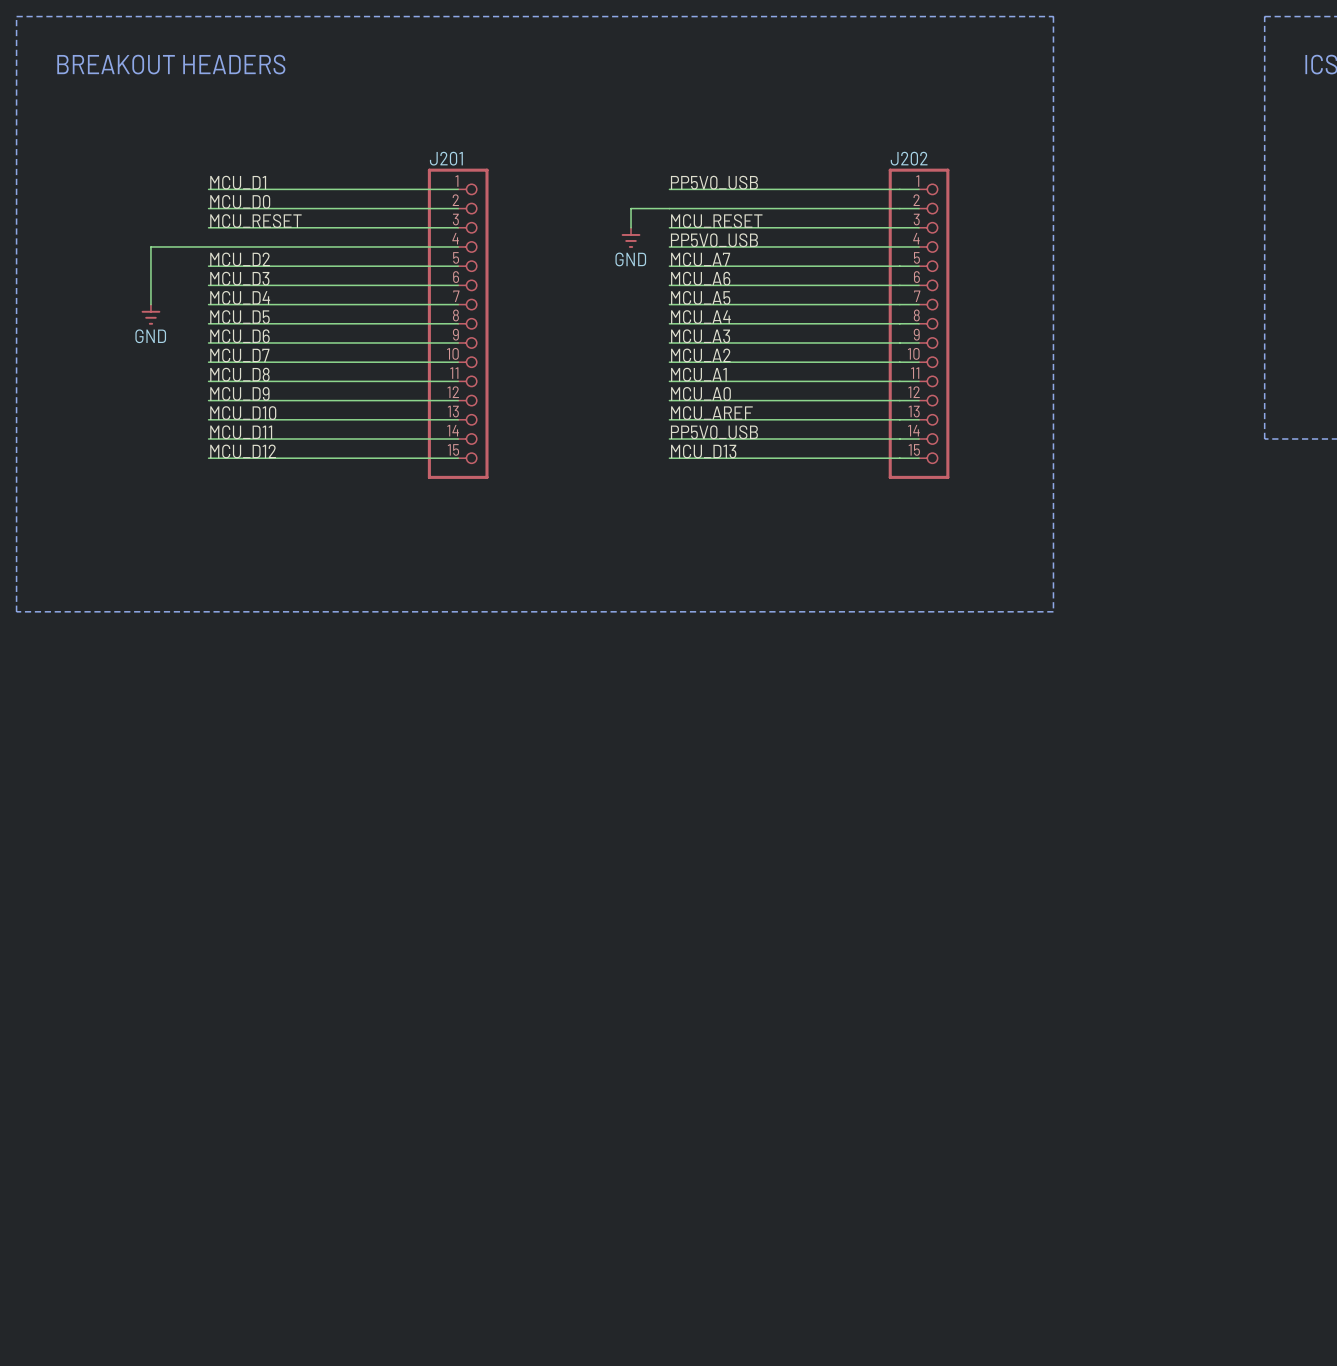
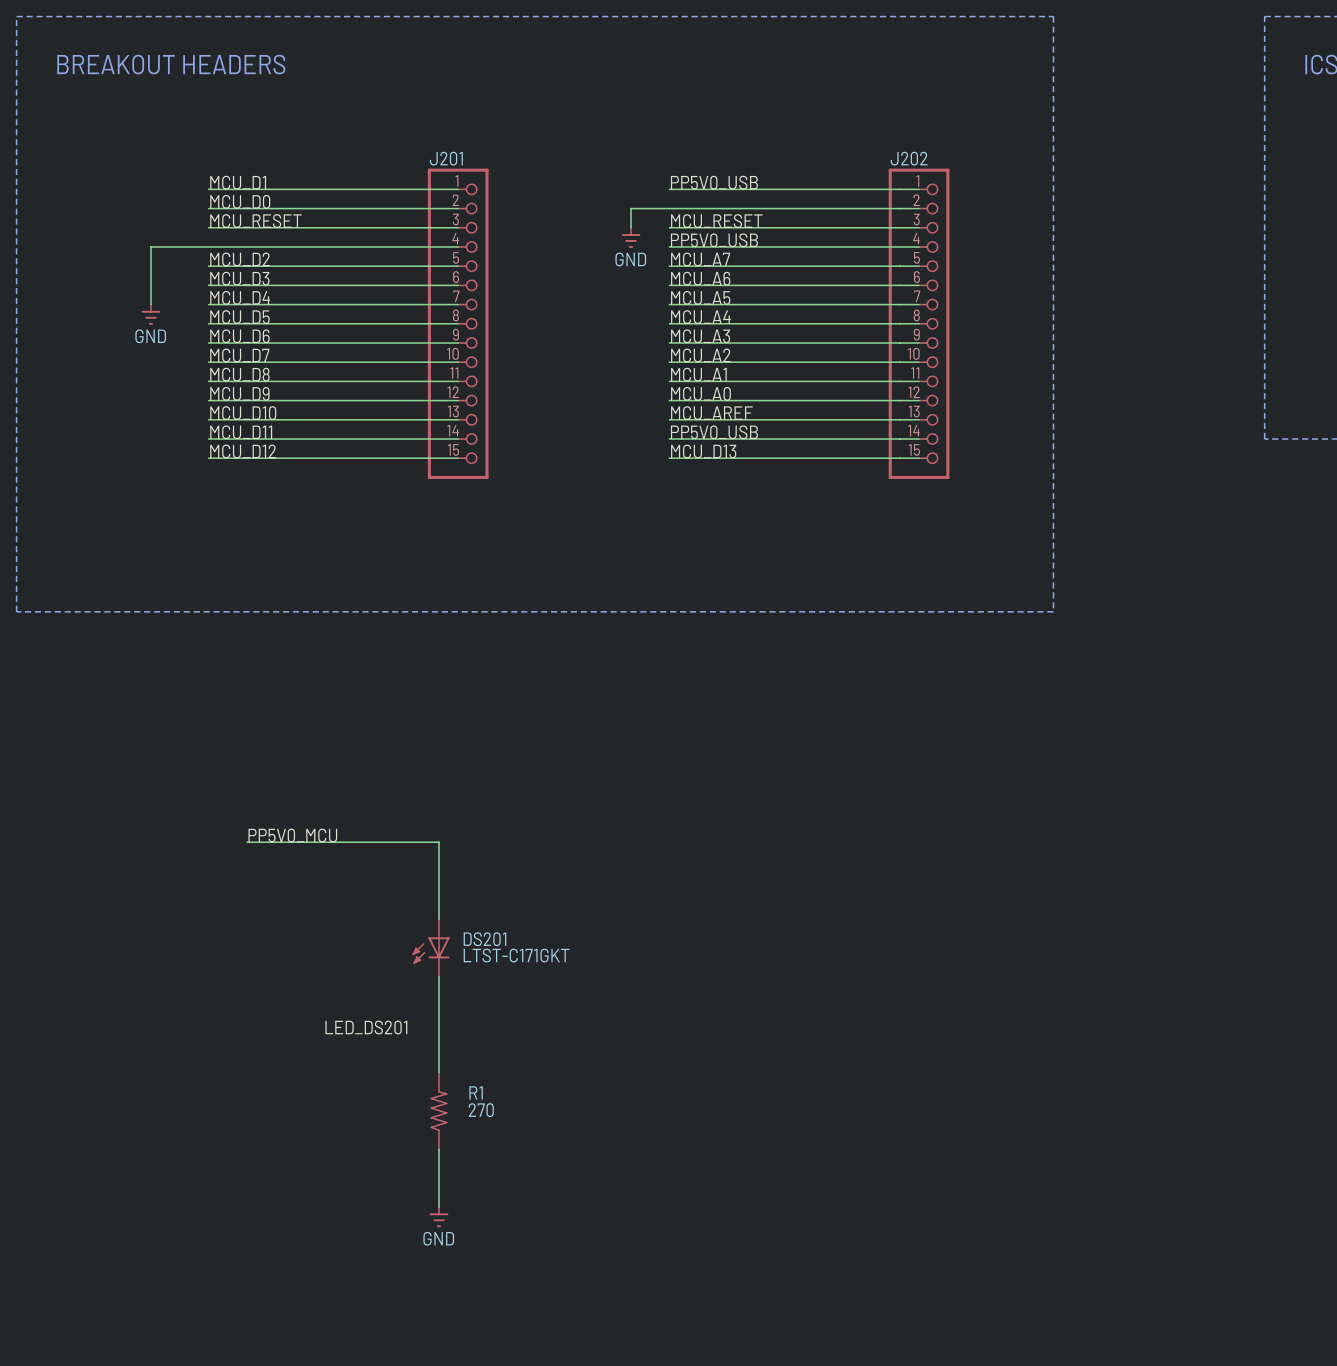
label: none -> PP5V0_MCU (292, 835)
wire: none -> (246, 842) (439, 842) (439, 919)
DS201: none -> LTST-C171GKT (431, 947)
wire: none -> (439, 976) (439, 1072)
label: none -> LED_DS201 (366, 1027)
R1: none -> 270 (439, 1111)
wire: none -> (439, 1149) (439, 1207)
power symbol: none -> GND (439, 1216)

